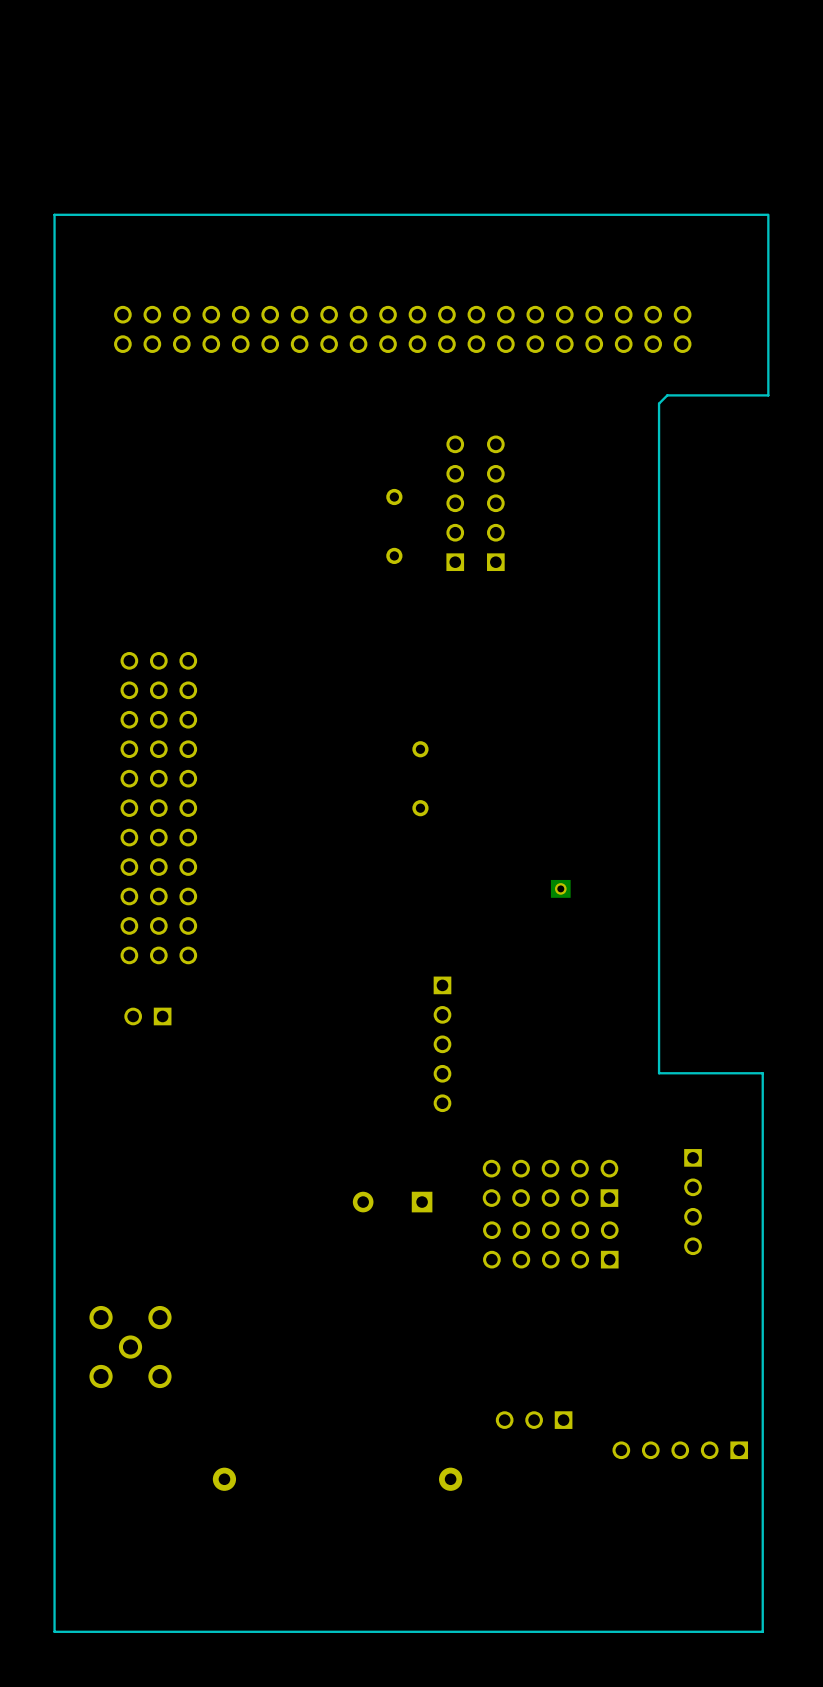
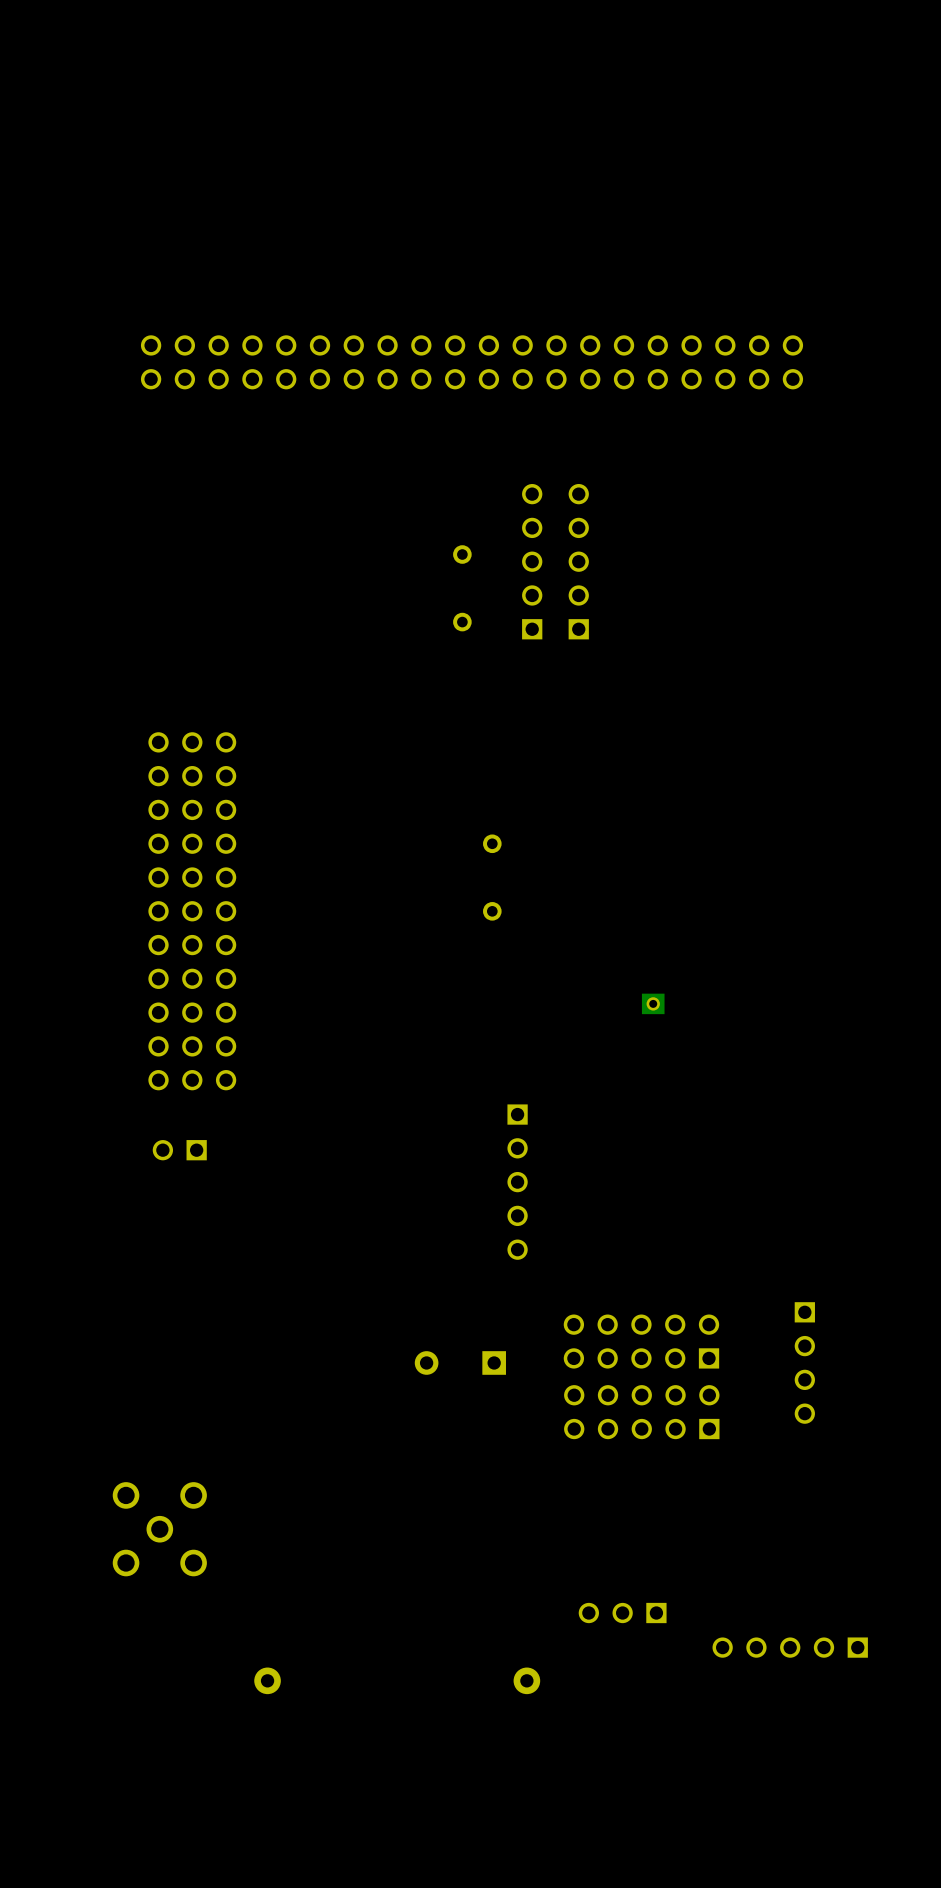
line: (768, 214) (768, 395) (667, 395) (659, 403) (659, 1073) (762, 1073) (762, 1631) (54, 1631) (54, 214) (767, 214) -> none

